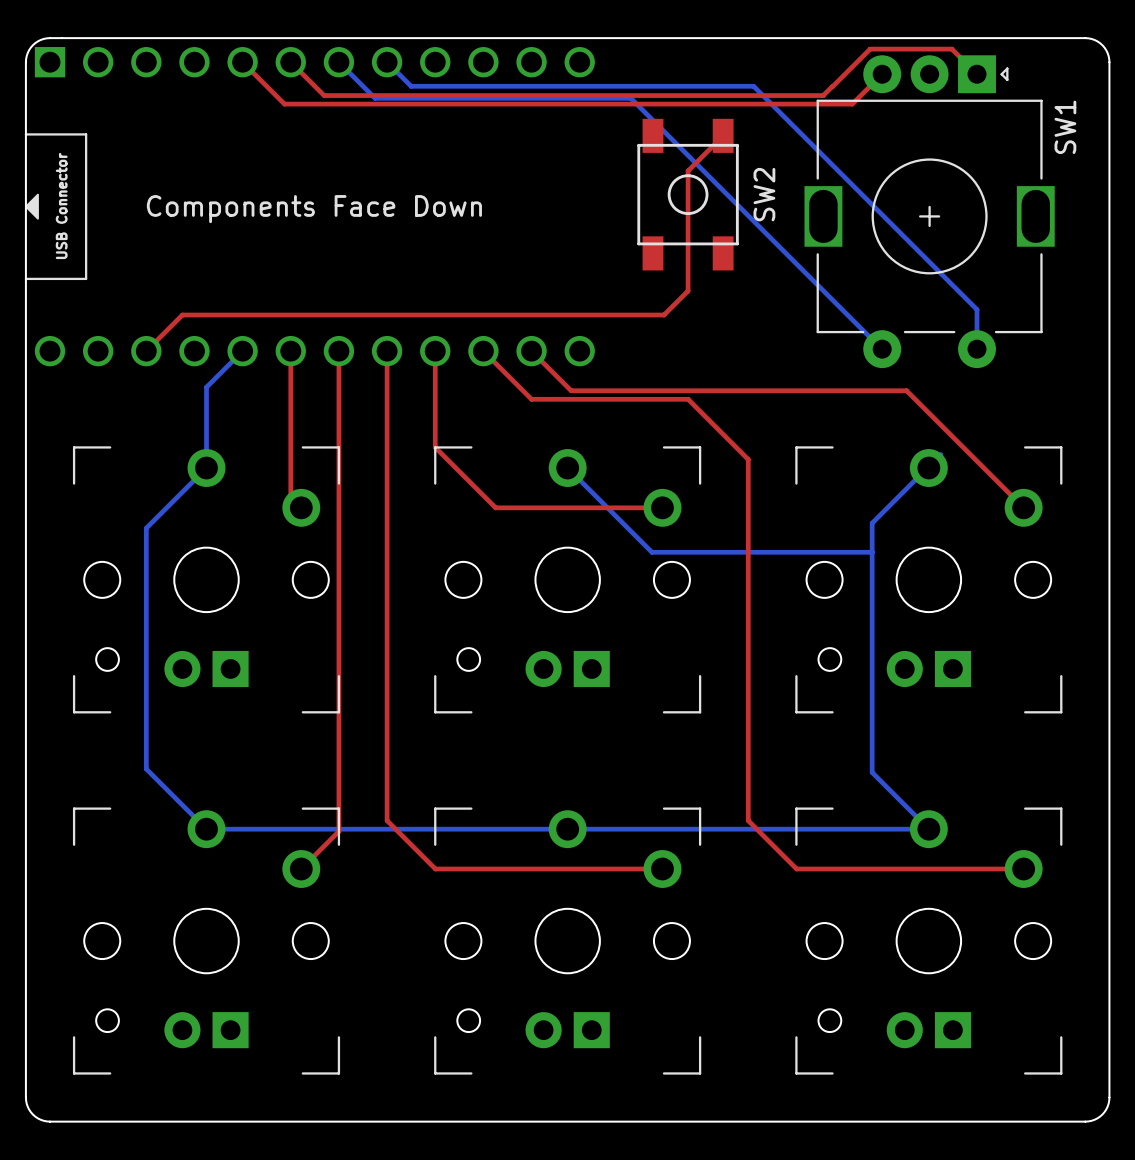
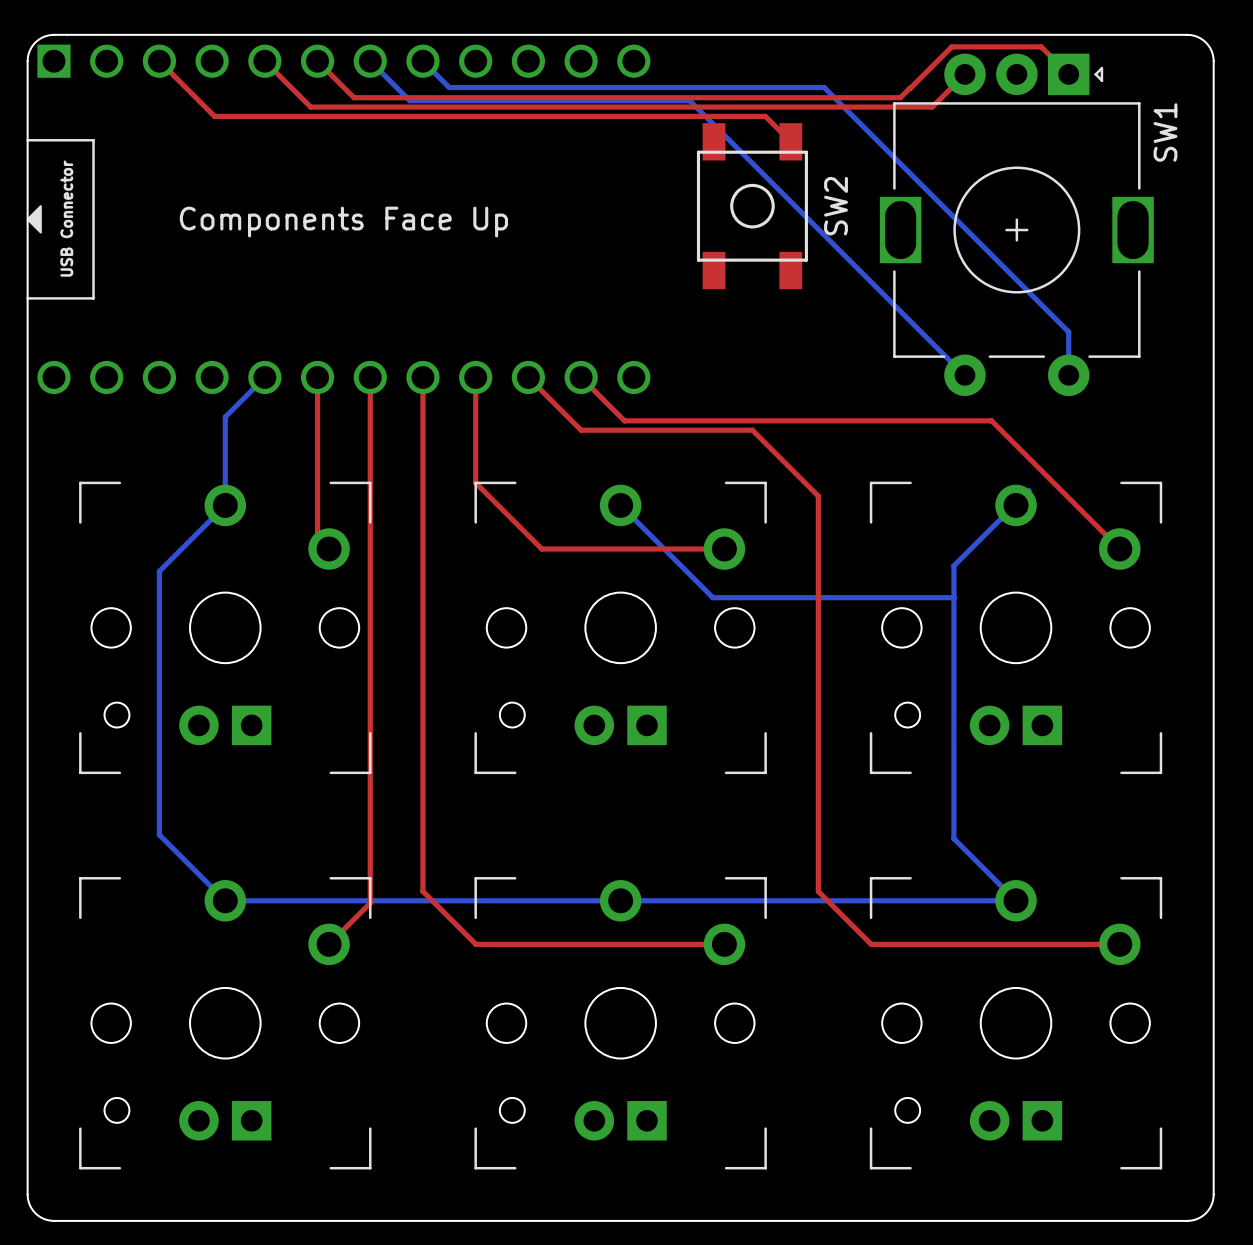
top track: (723, 135) (688, 170) (688, 290) (663, 315) (182, 315) (146, 351) -> (790, 141) (765, 116) (214, 116) (159, 61)
text: Components Face Down (314, 209) -> Components Face Up (343, 222)

